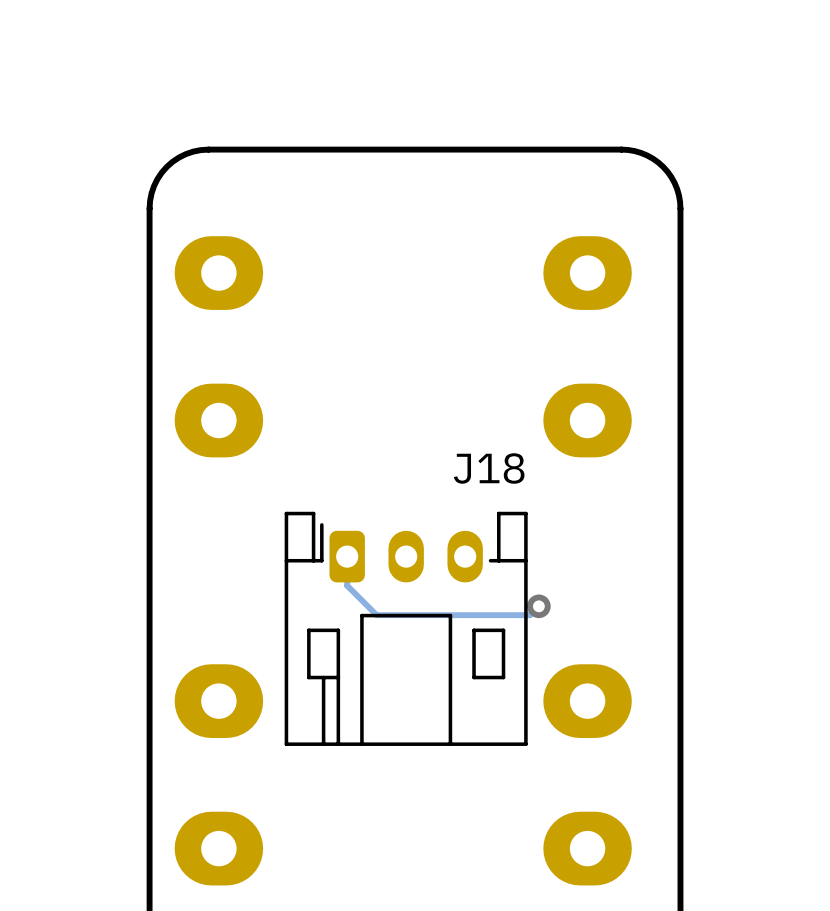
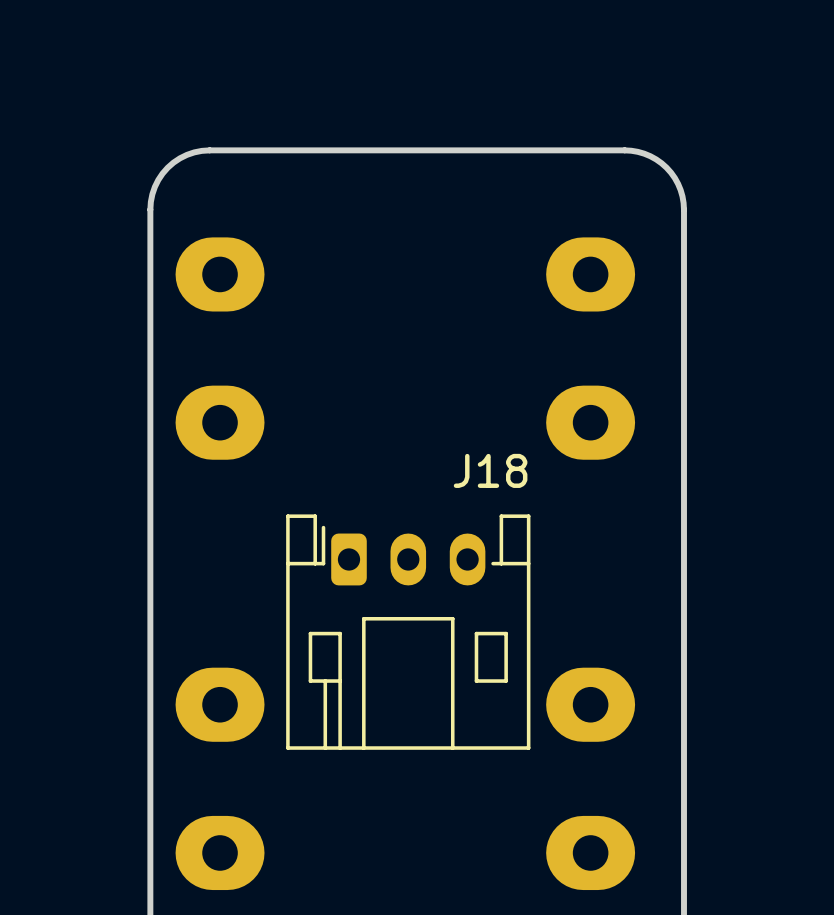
track: (347, 556) (347, 585) (376, 615) (530, 615) (538, 606) -> none
via: (538, 606) -> none

